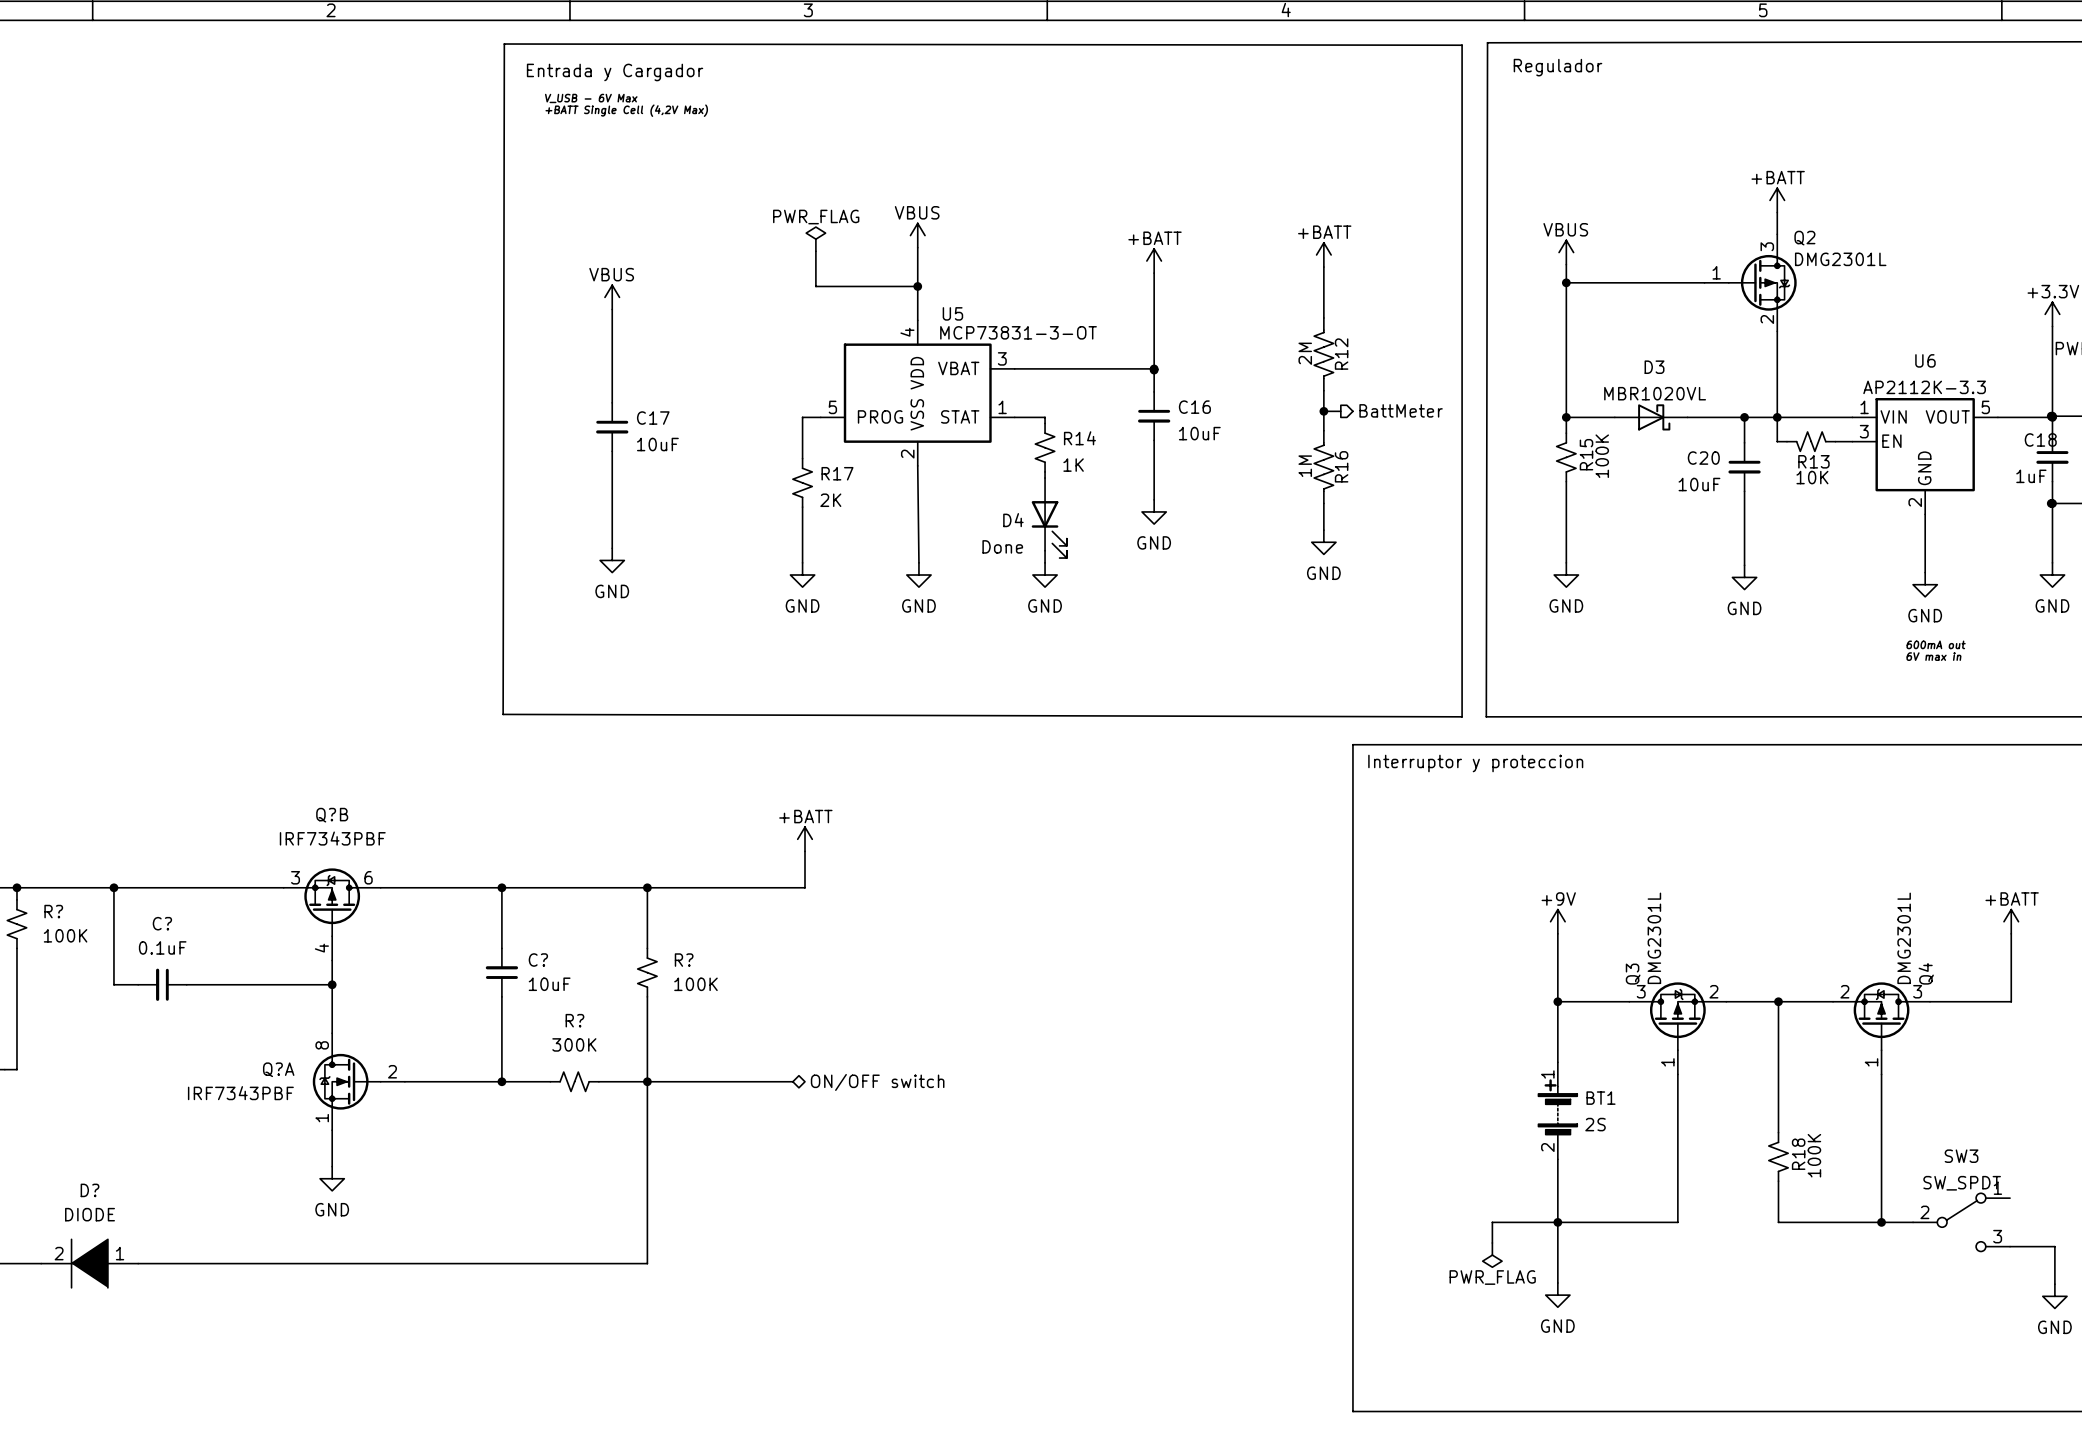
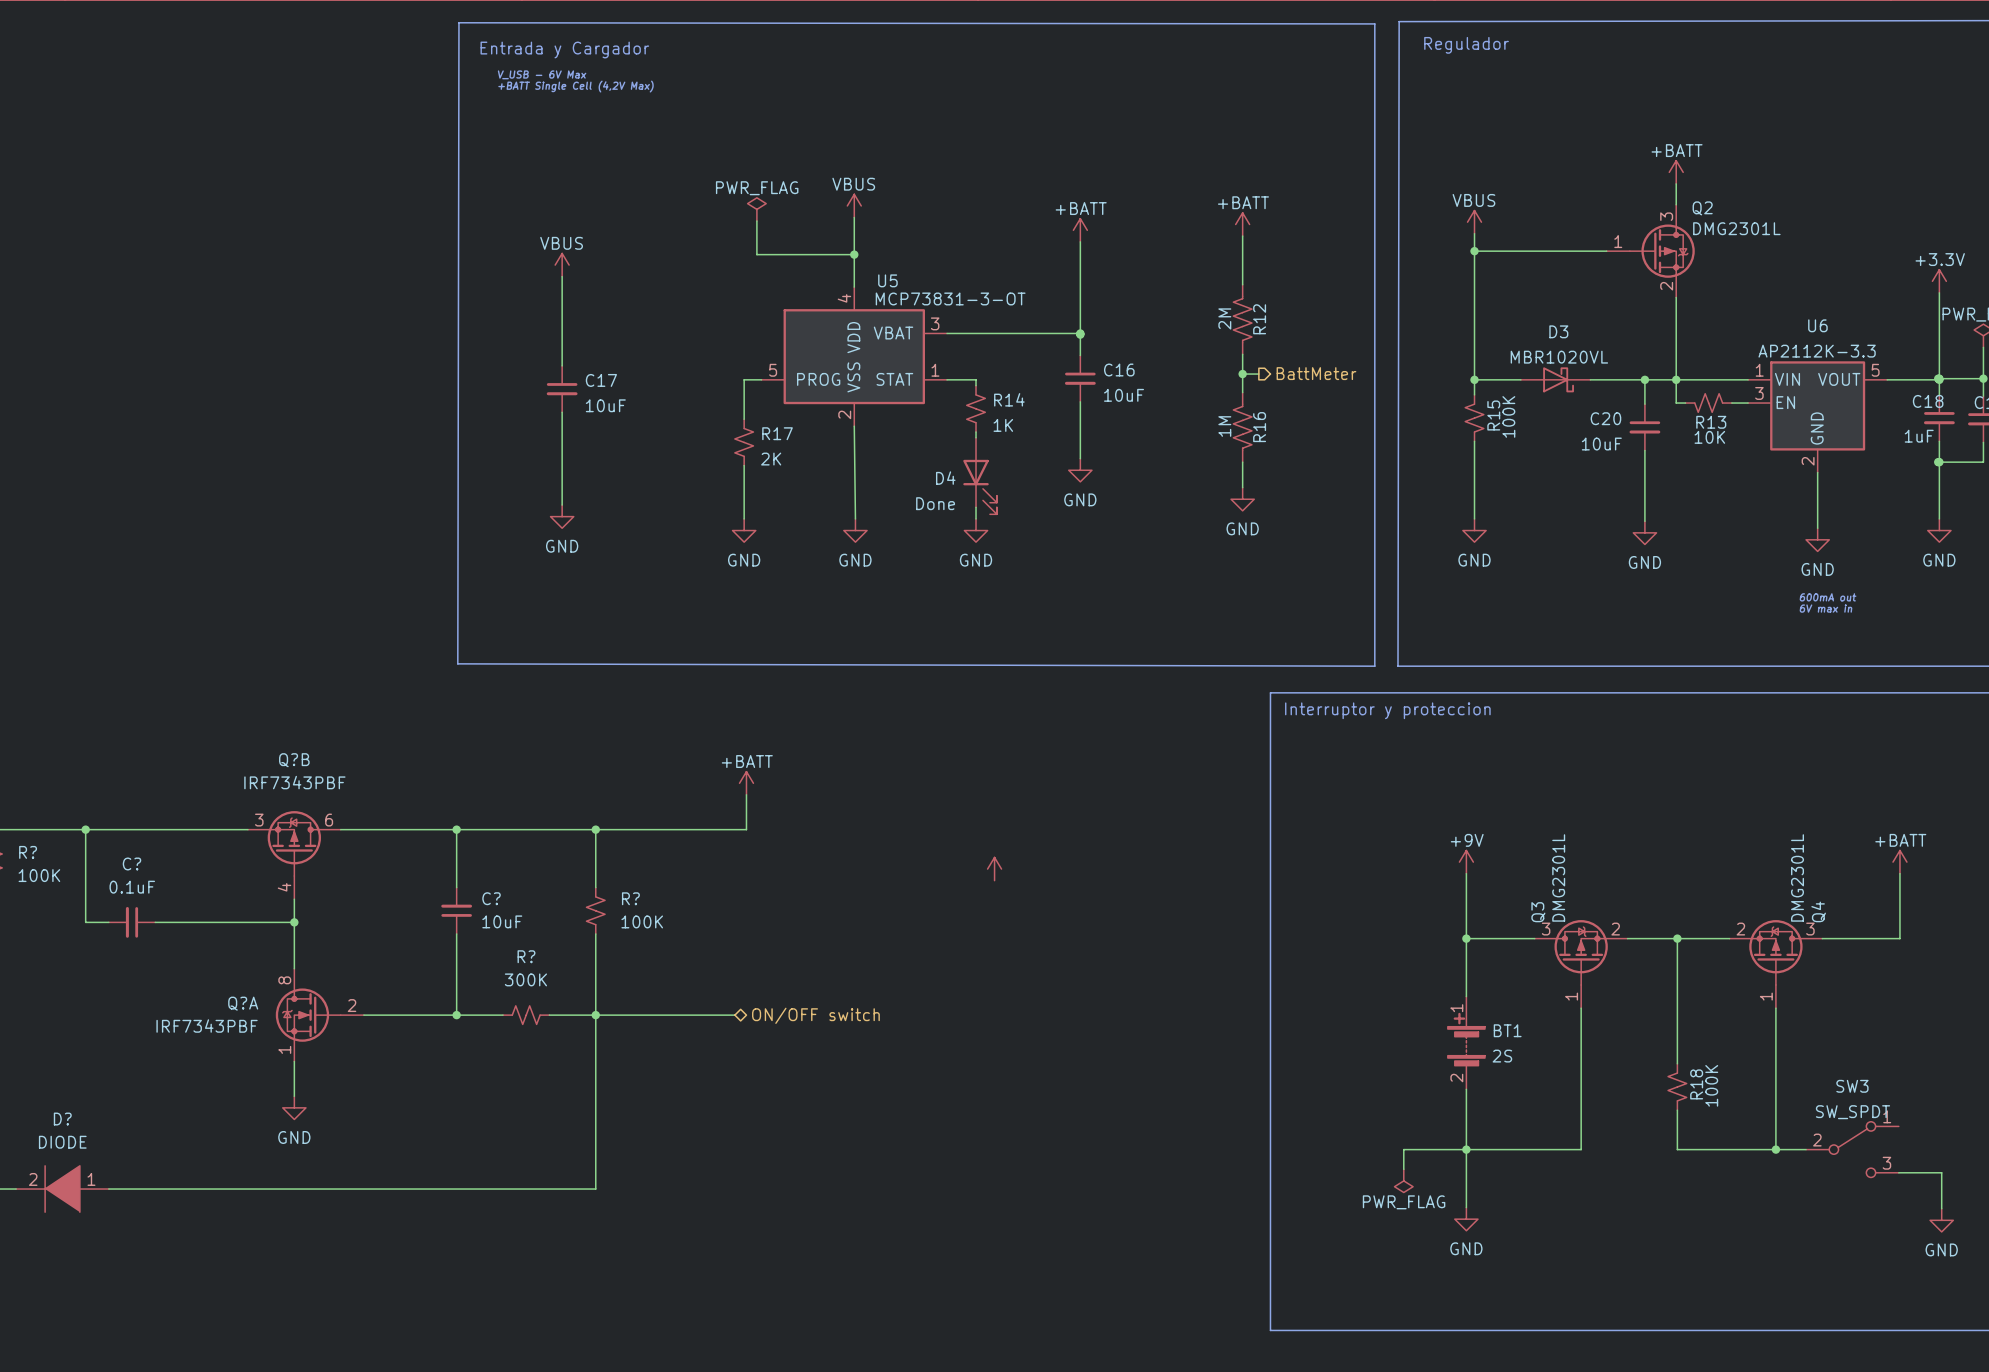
power symbol: none -> (994, 869)

